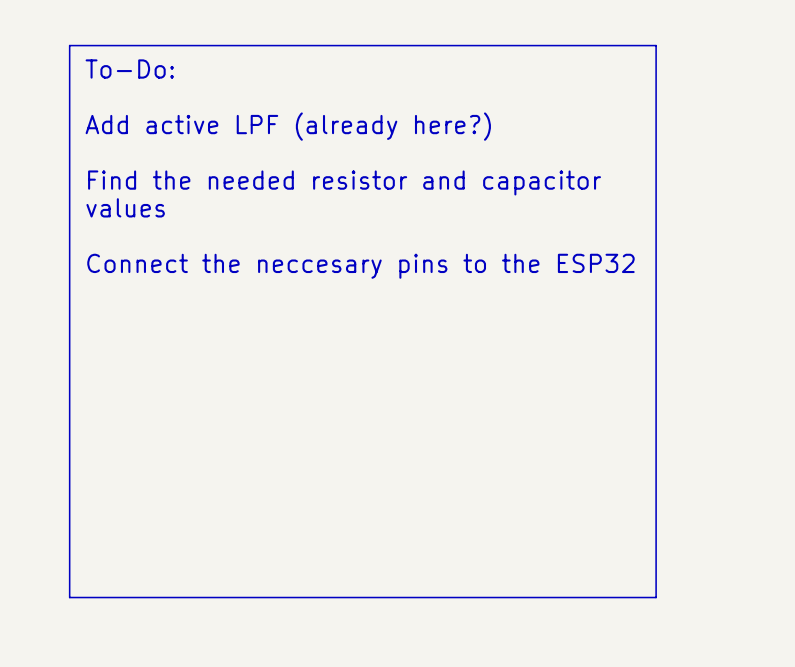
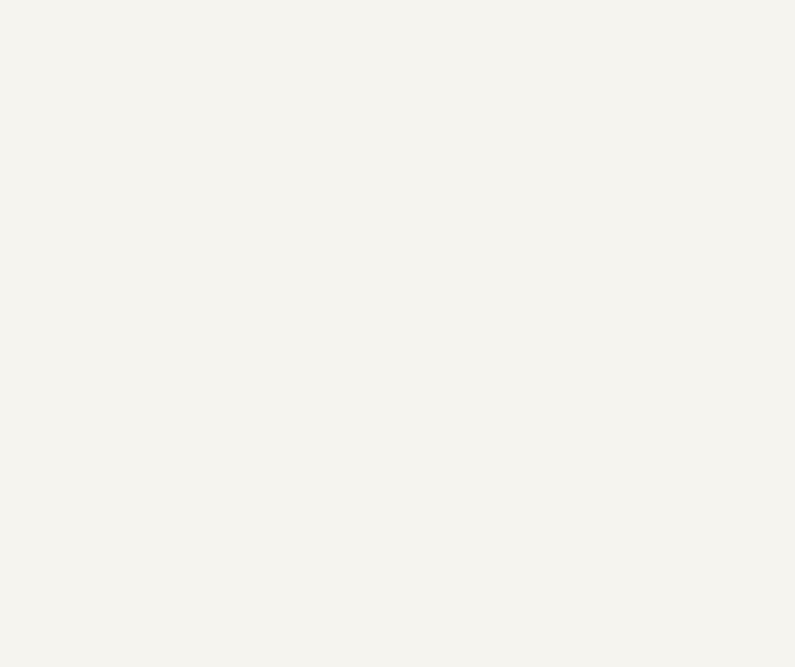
line: (69, 45) (656, 45) (656, 597) (69, 597) (69, 45) -> none
text: To-Do: (129, 69) -> none
text: Add active LPF (already here?) (288, 126) -> none
text: Find the needed resistor and capacitor (344, 182) -> none
text: values (125, 207) -> none
text: Connect the neccesary pins to the ESP32 (360, 266) -> none

